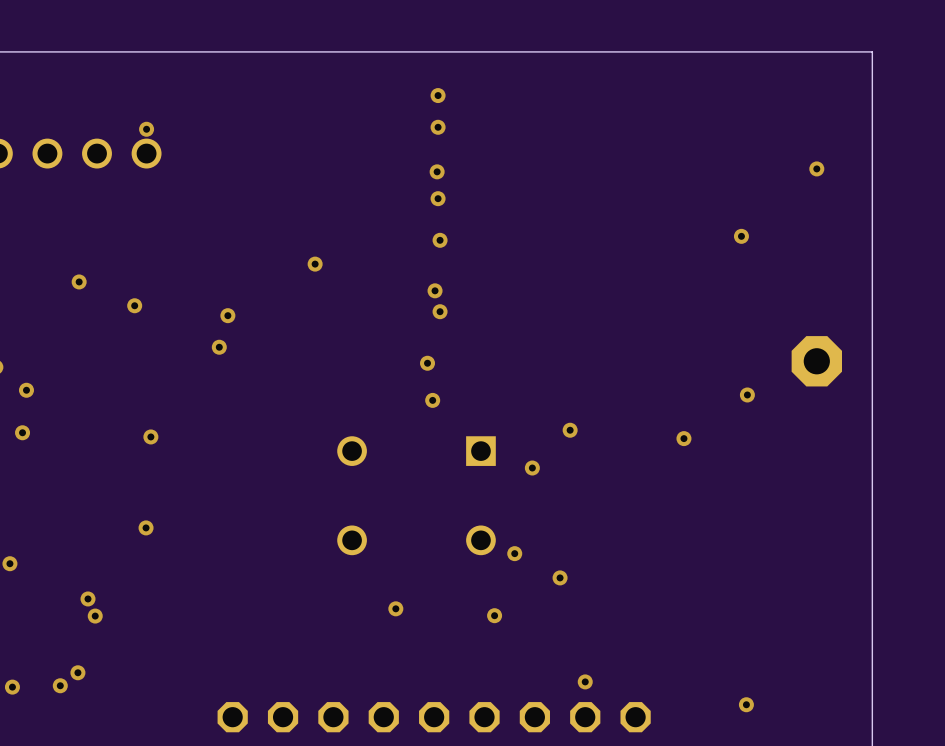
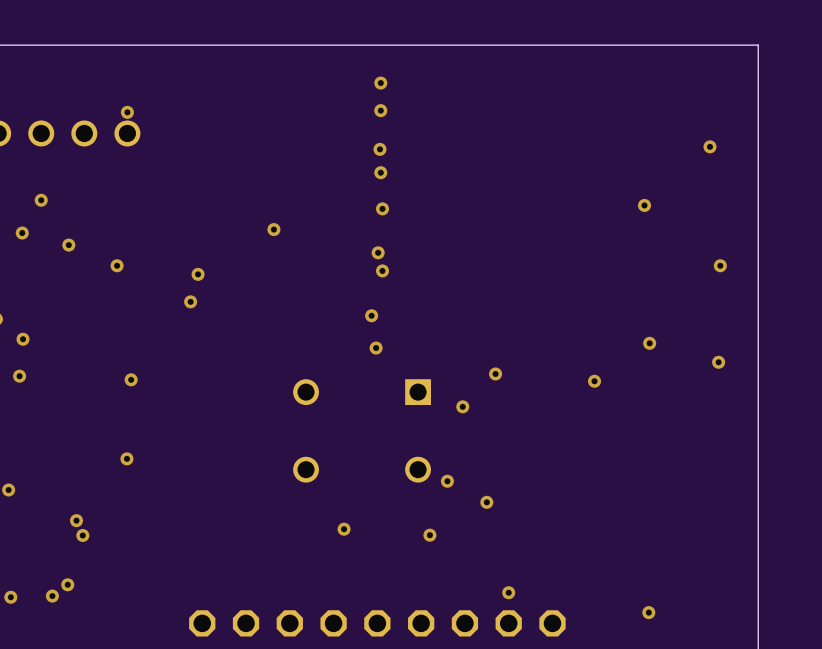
via: none -> (41, 200)
via: none -> (22, 233)
via: none -> (720, 265)
part: (816, 361) -> none
via: none -> (718, 362)

